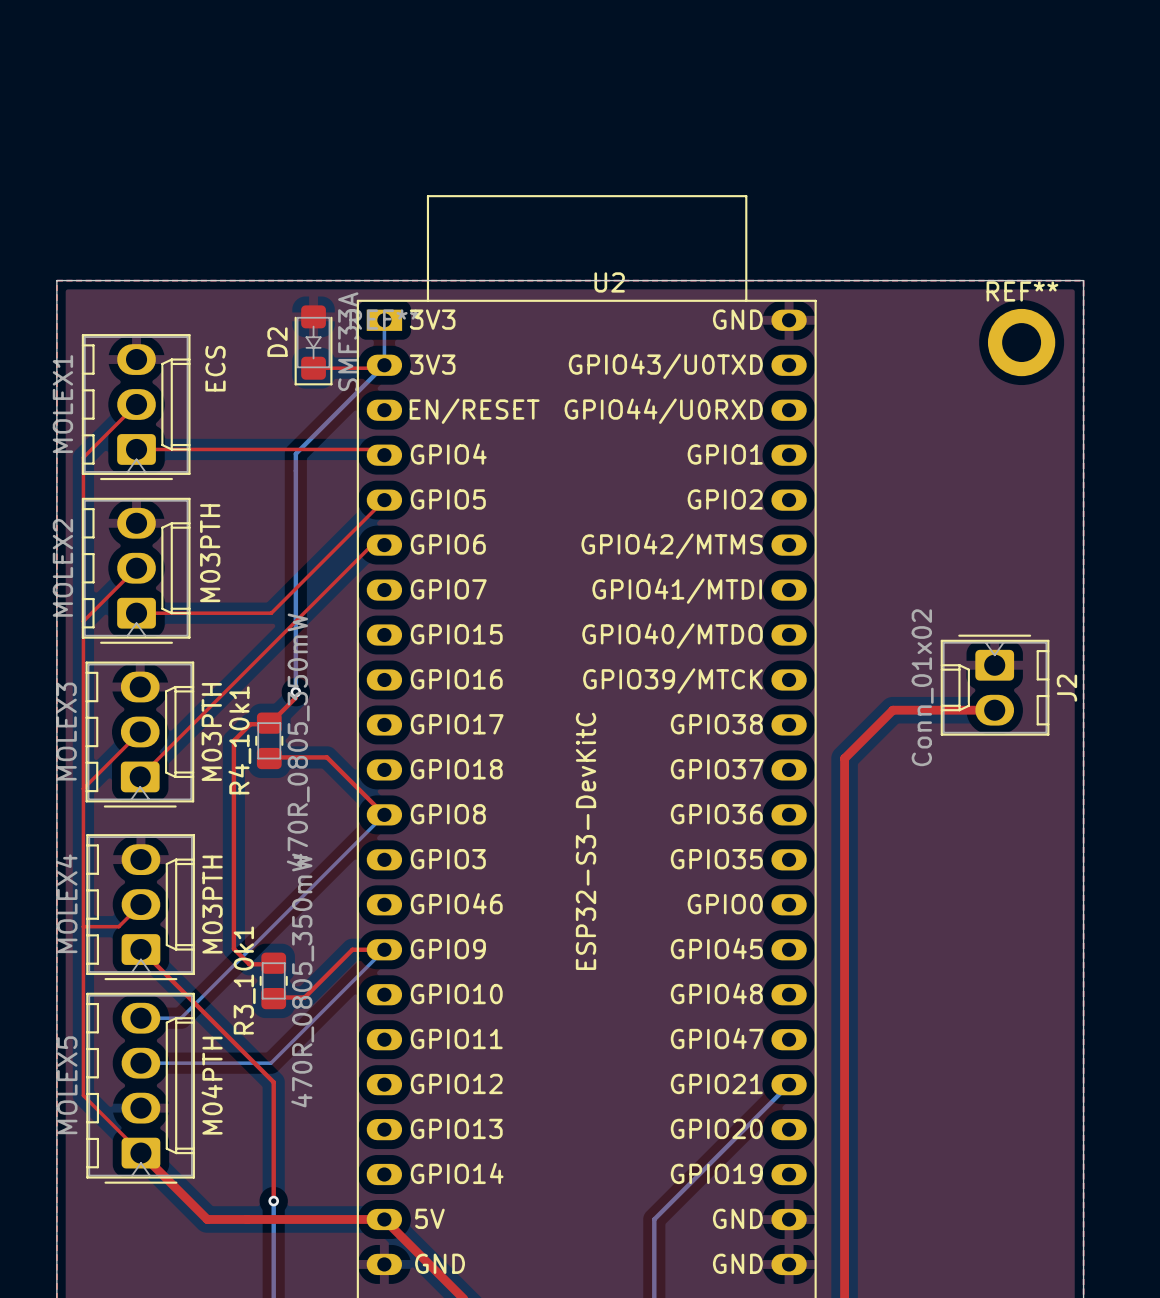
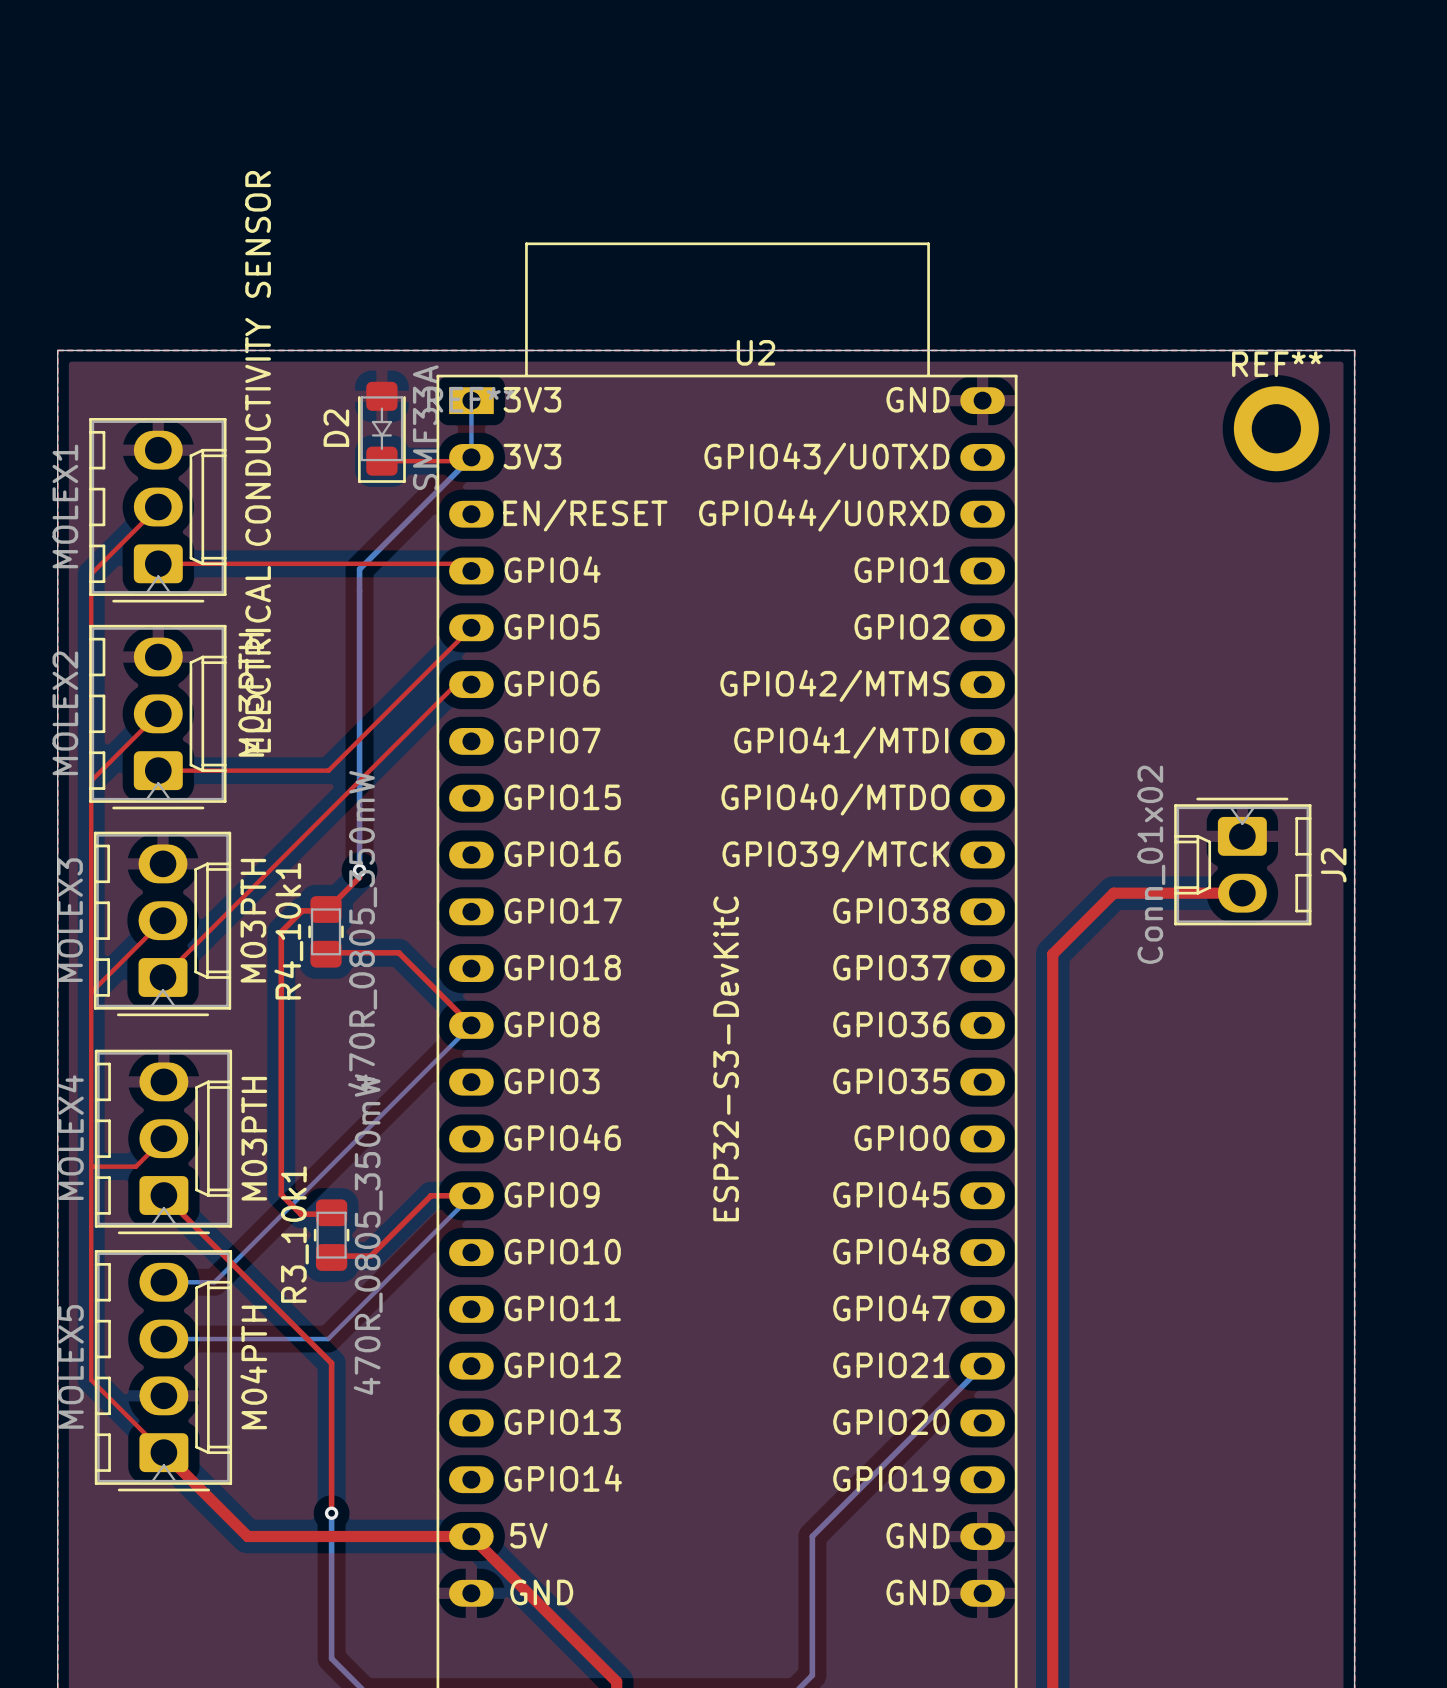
MOLEX1 value: ECS (215, 368) -> ELECTRICAL CONDUCTIVITY SENSOR (258, 461)

